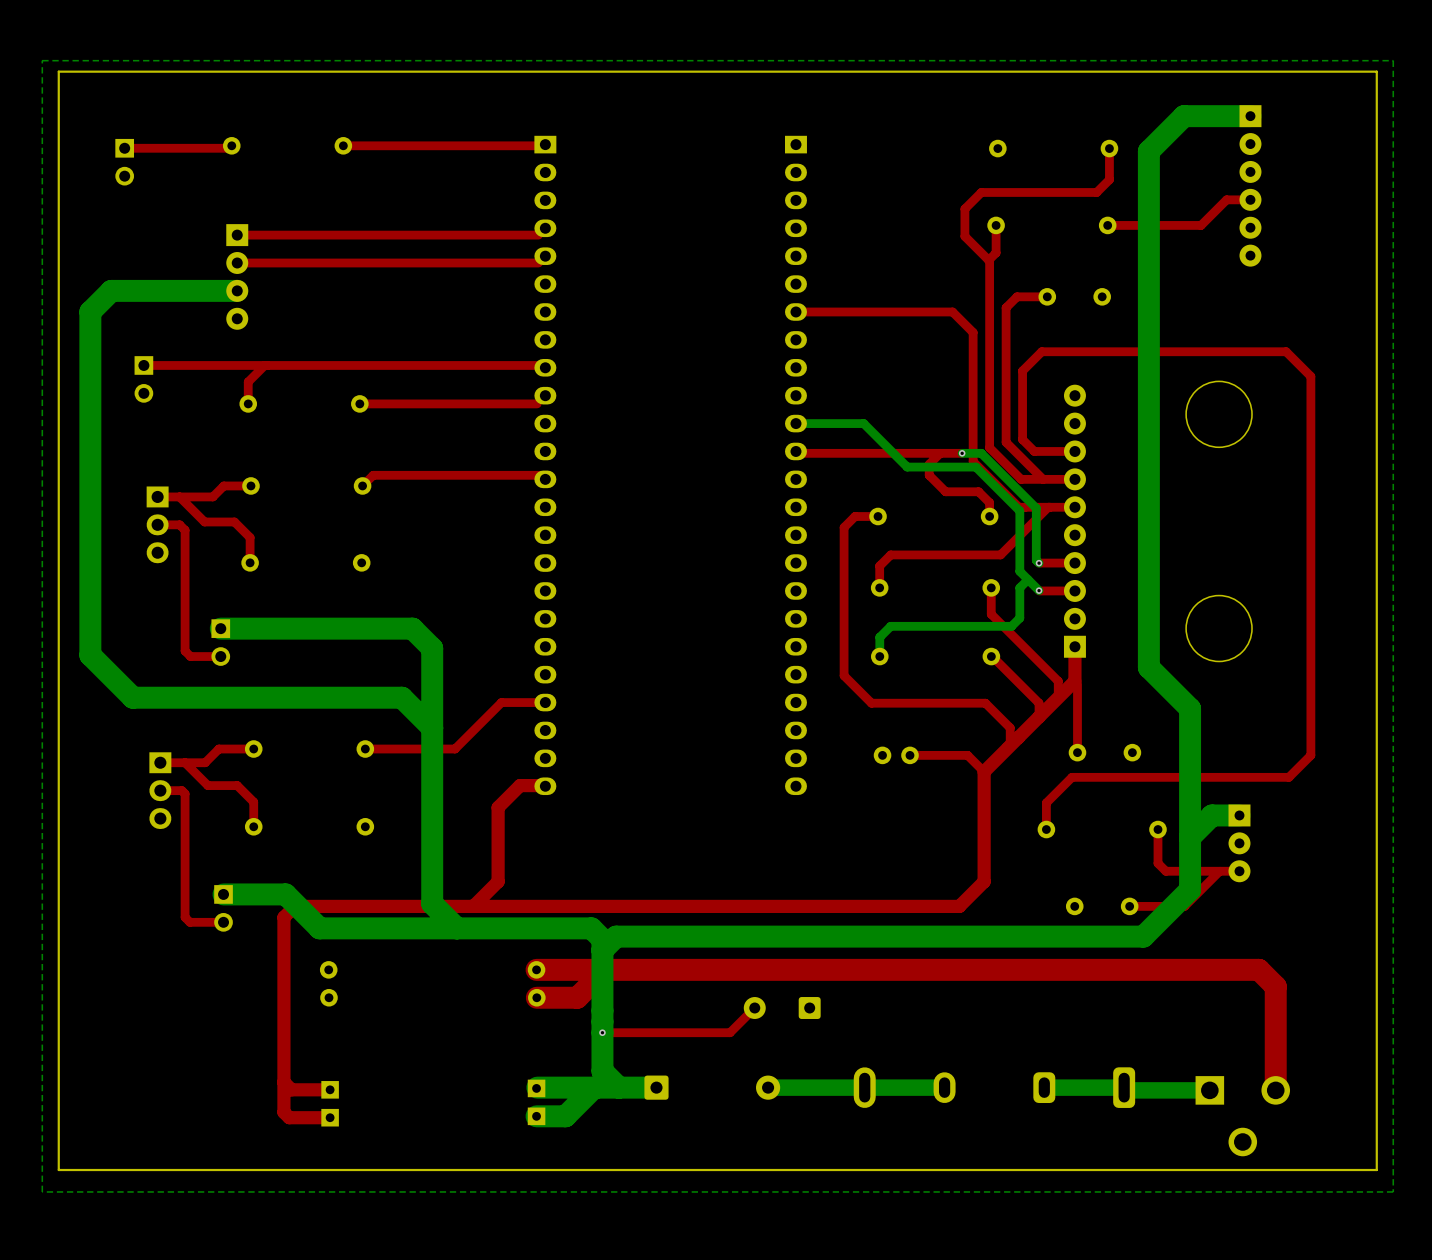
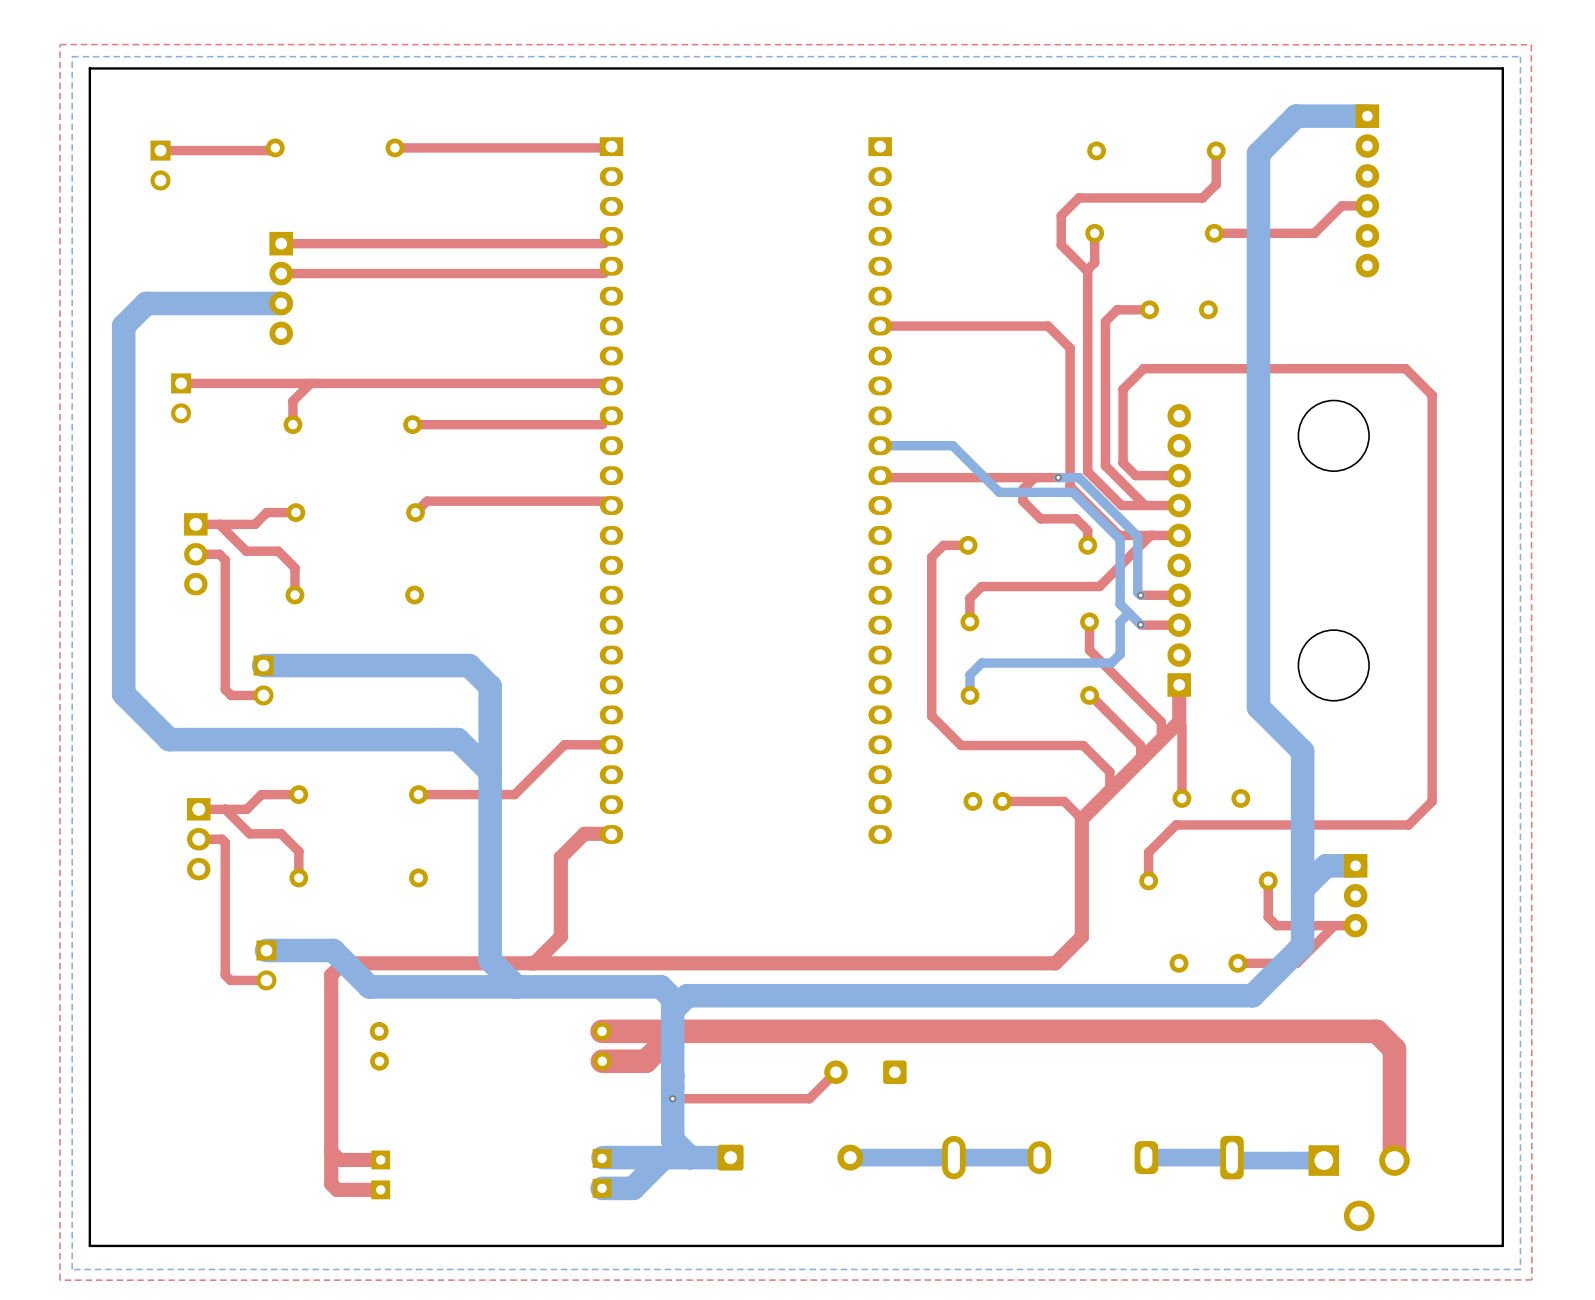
top zone outline: none -> (60, 44) (59, 1280) (1531, 1279) (1531, 44) (60, 44)

